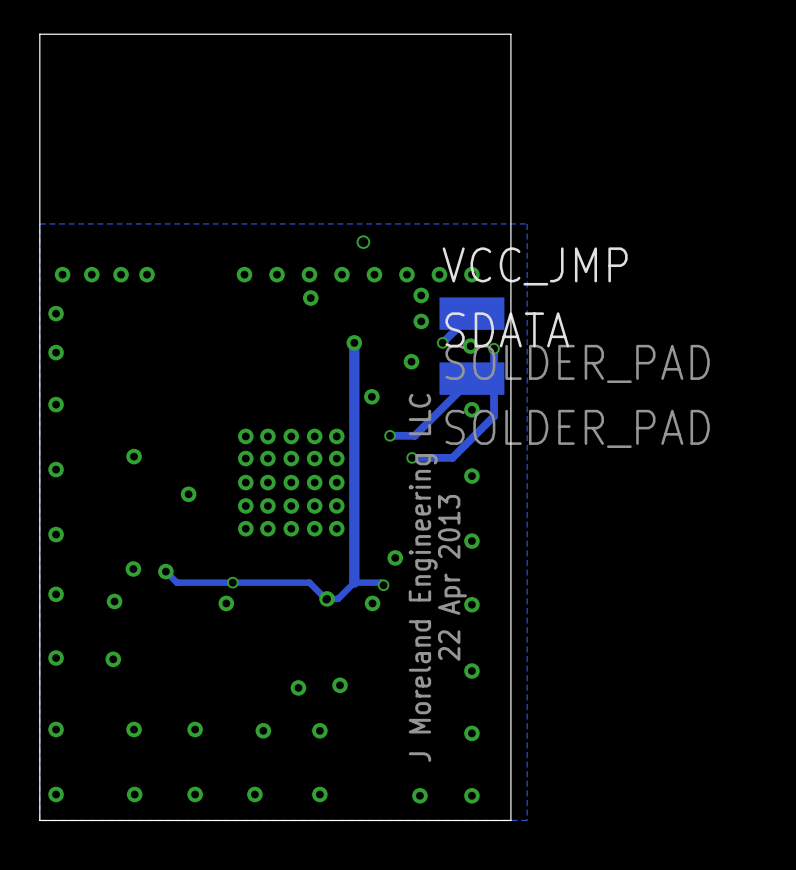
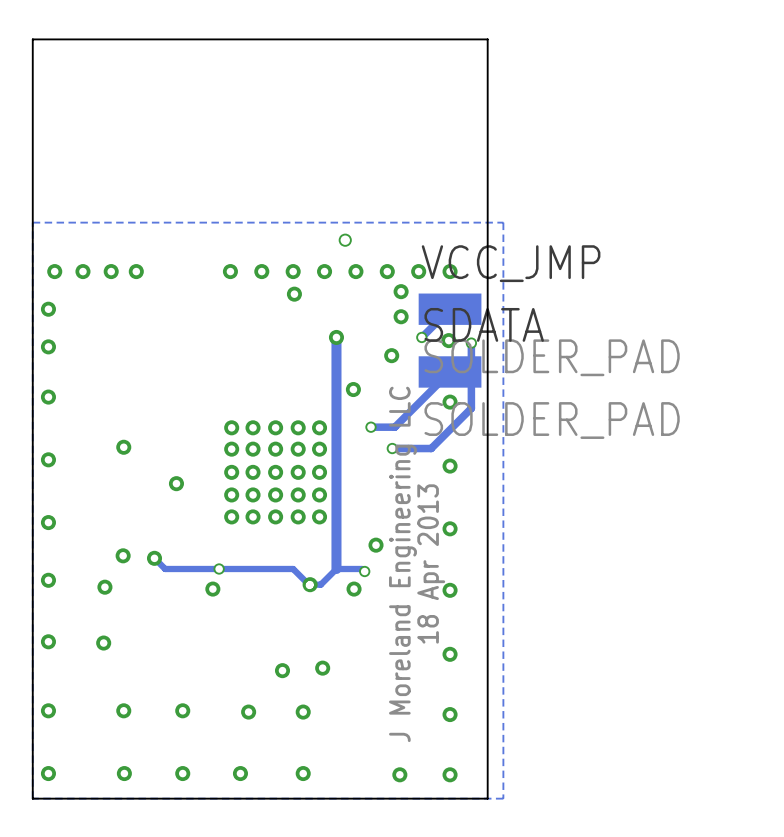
text: 22 Apr 2013 (452, 577) -> 18 Apr 2013 (431, 563)

